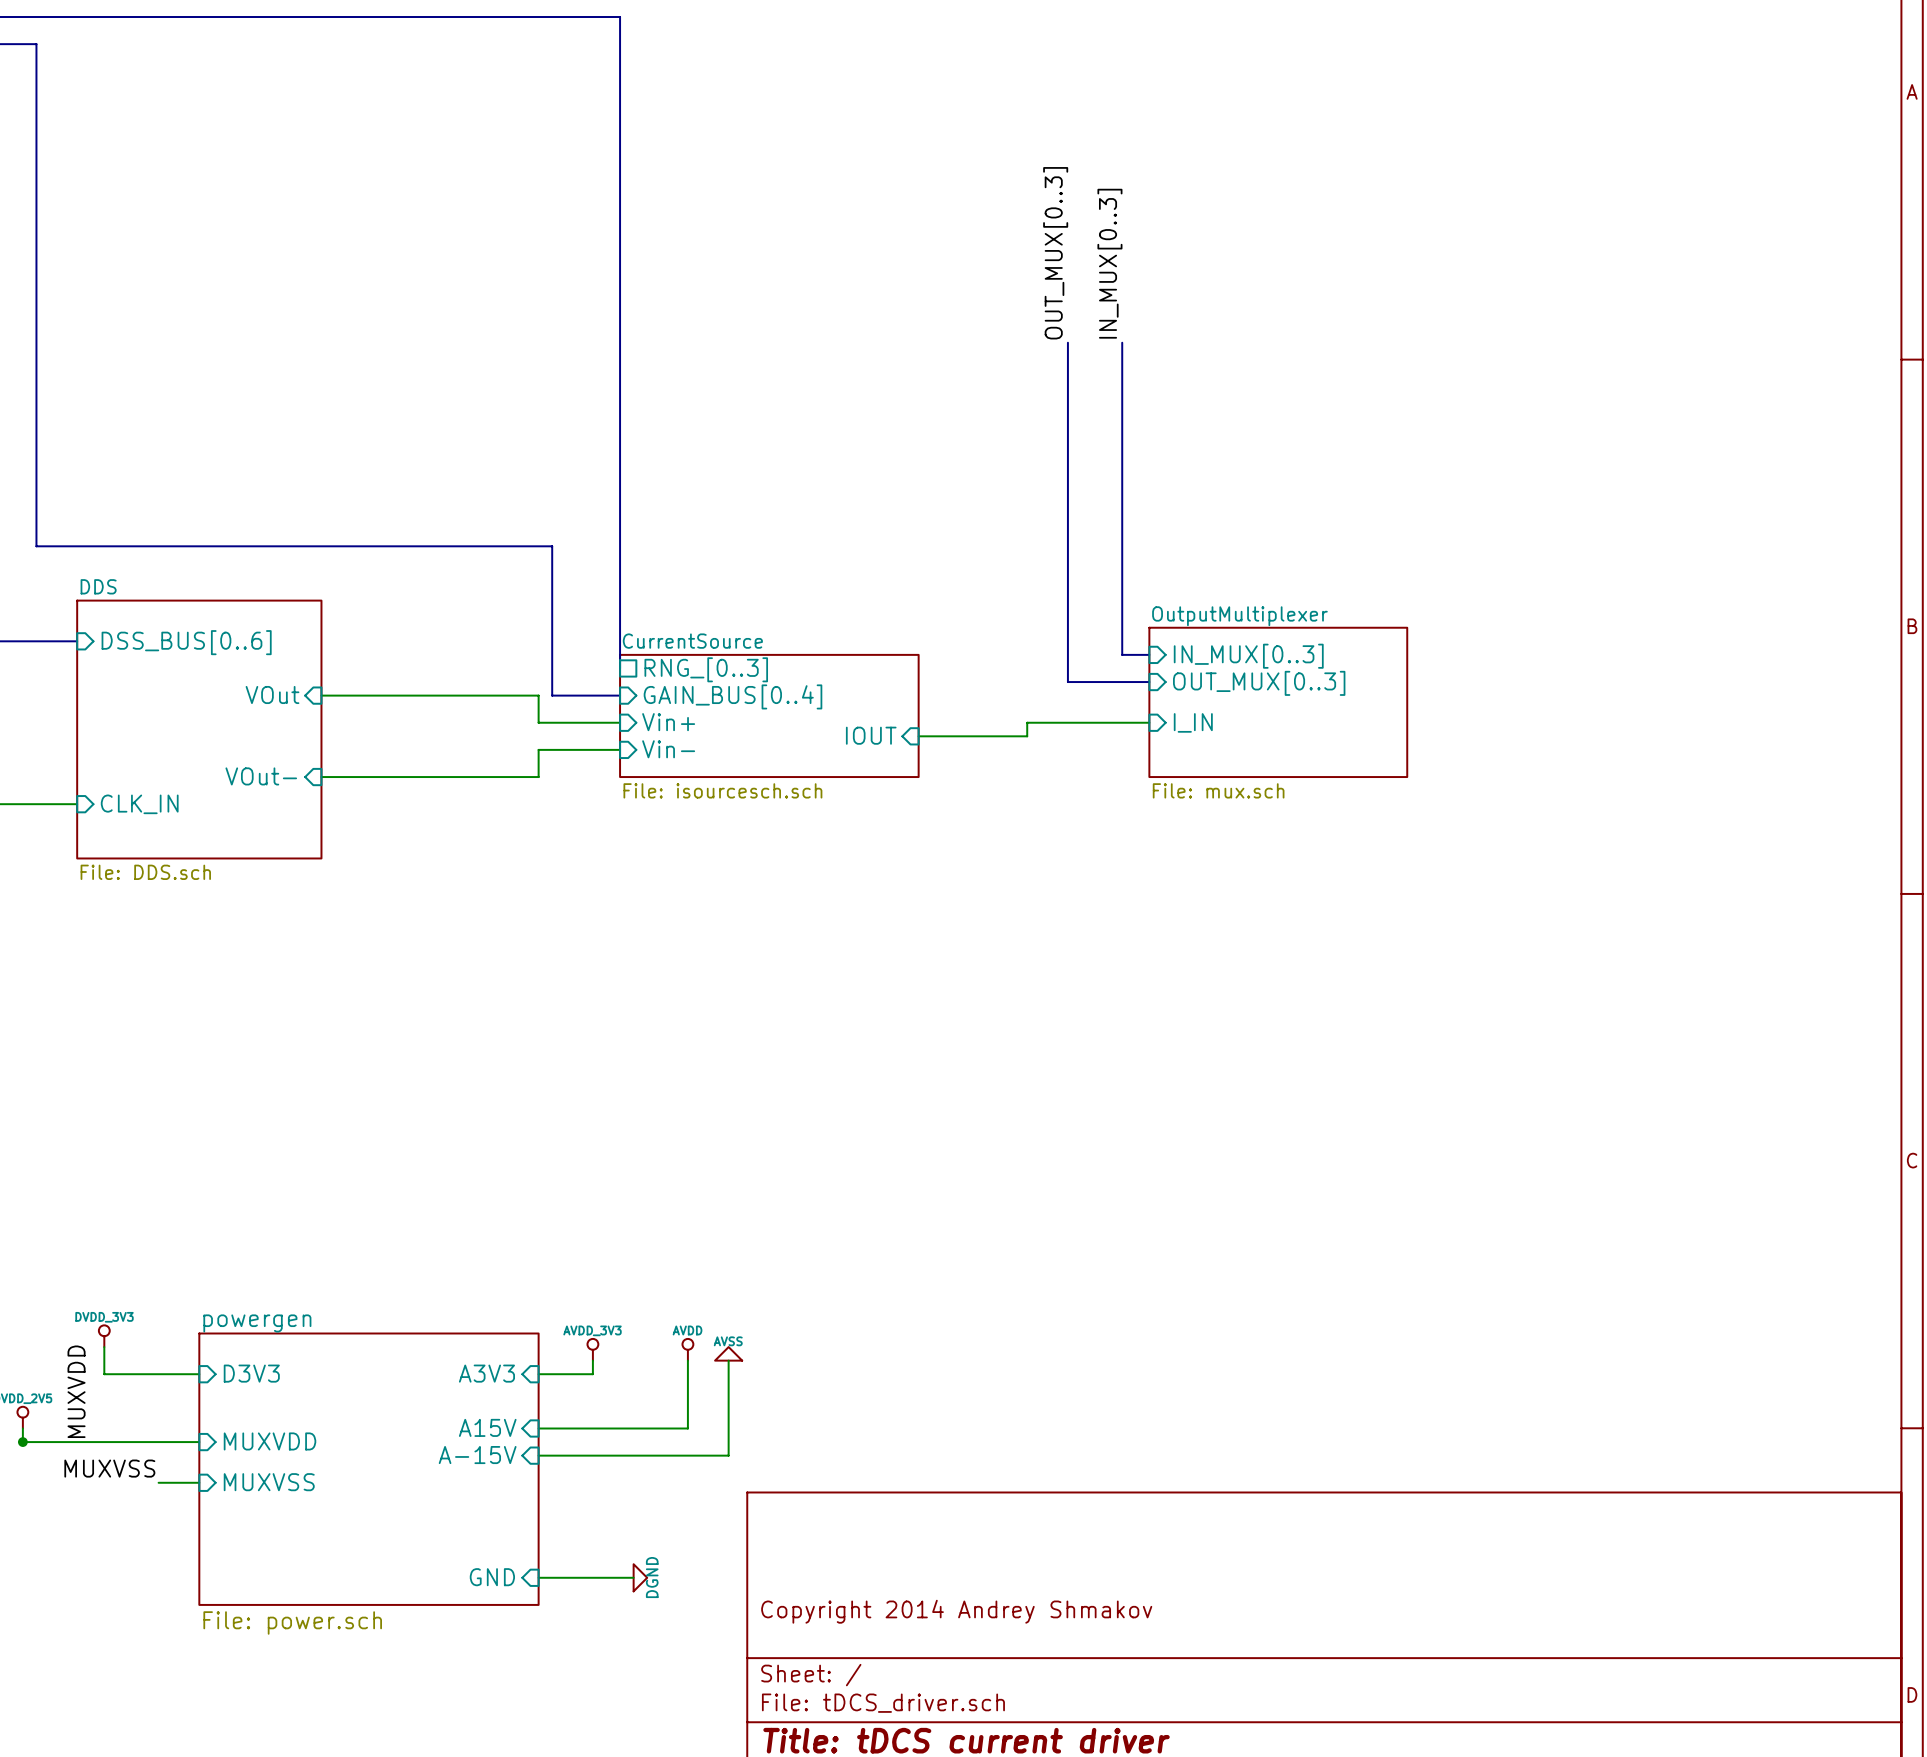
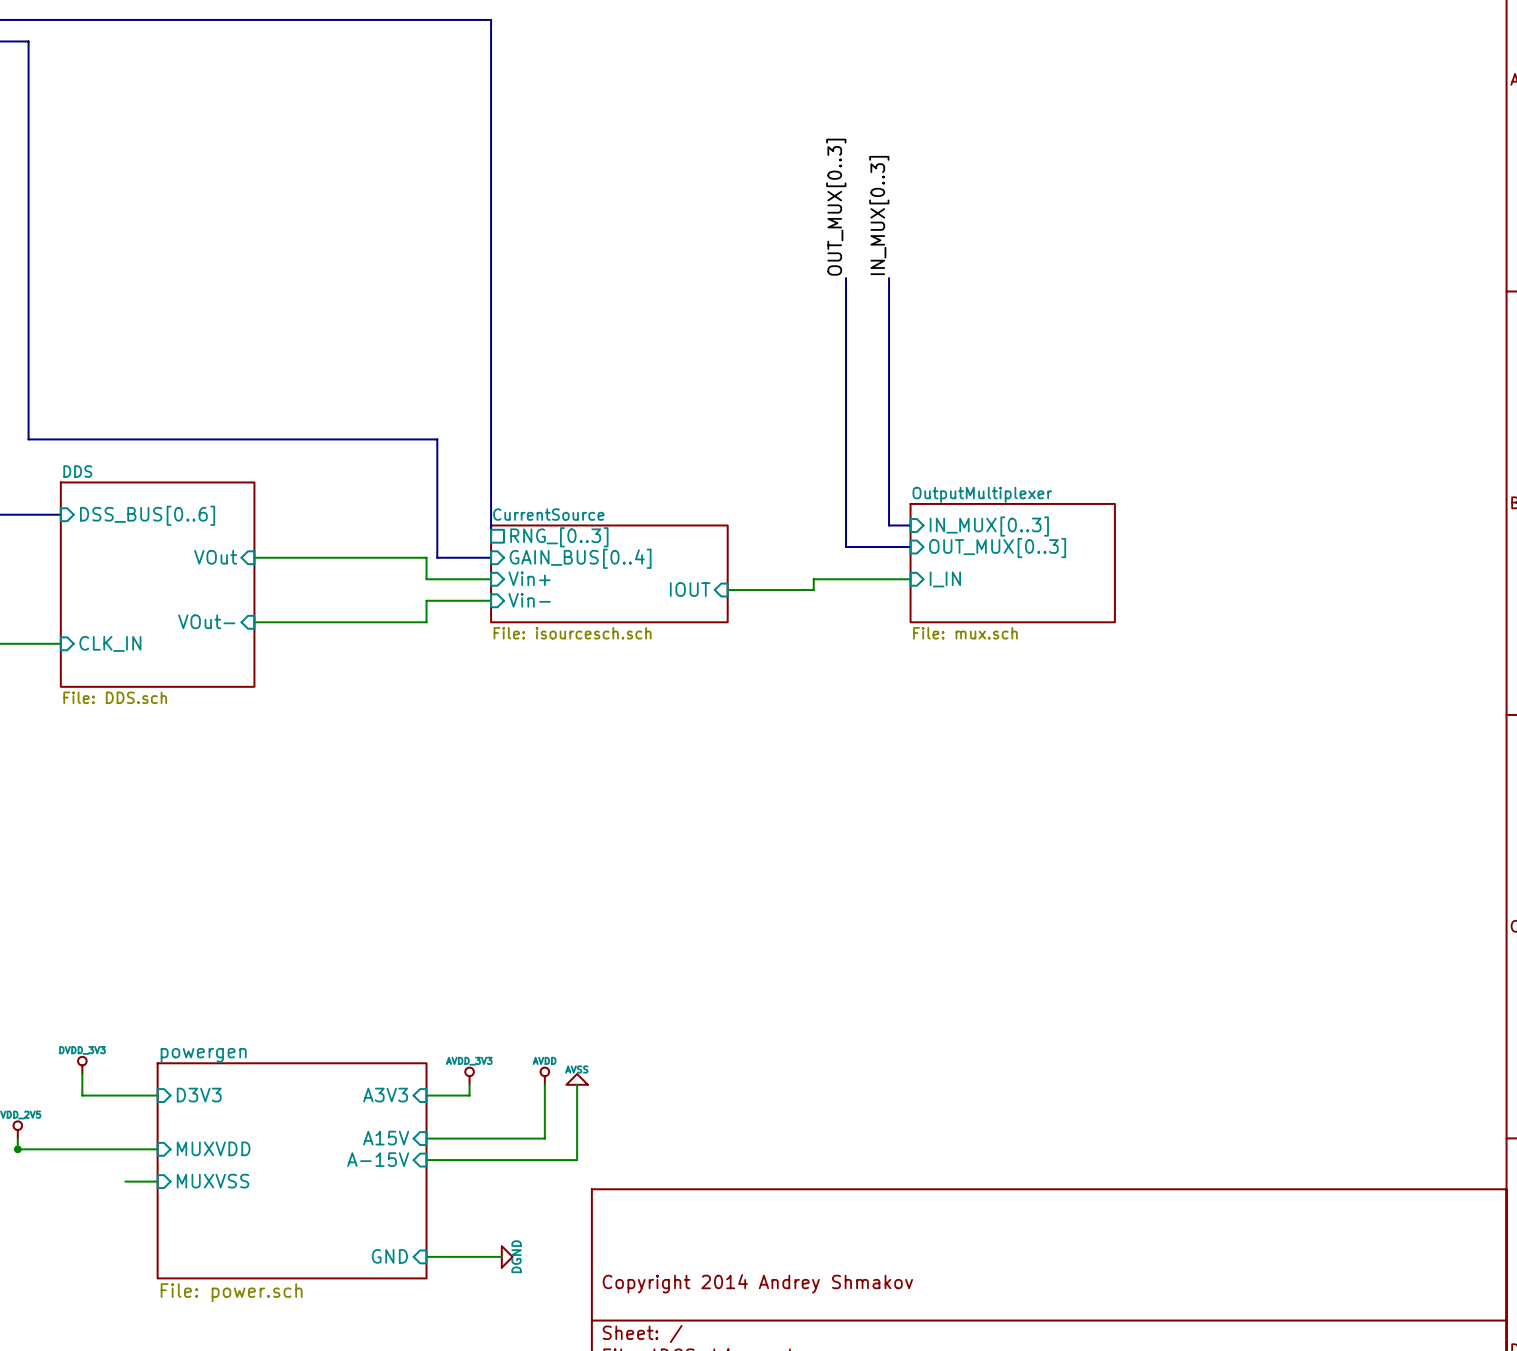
label: MUXVDD (76, 1391) -> none
label: MUXVSS (109, 1468) -> none

